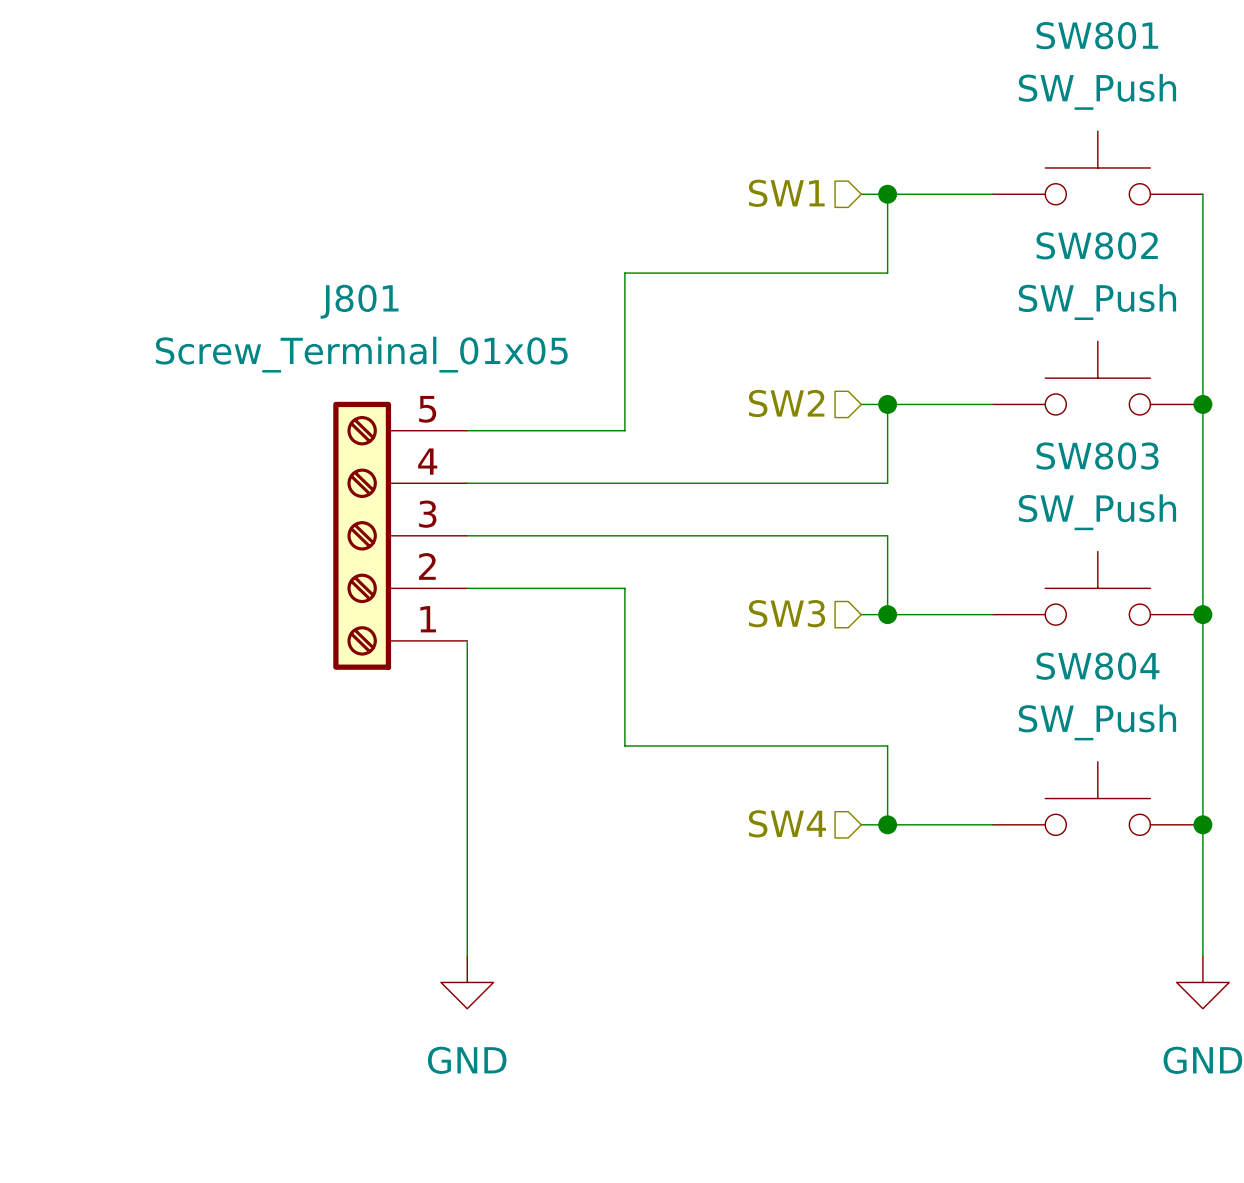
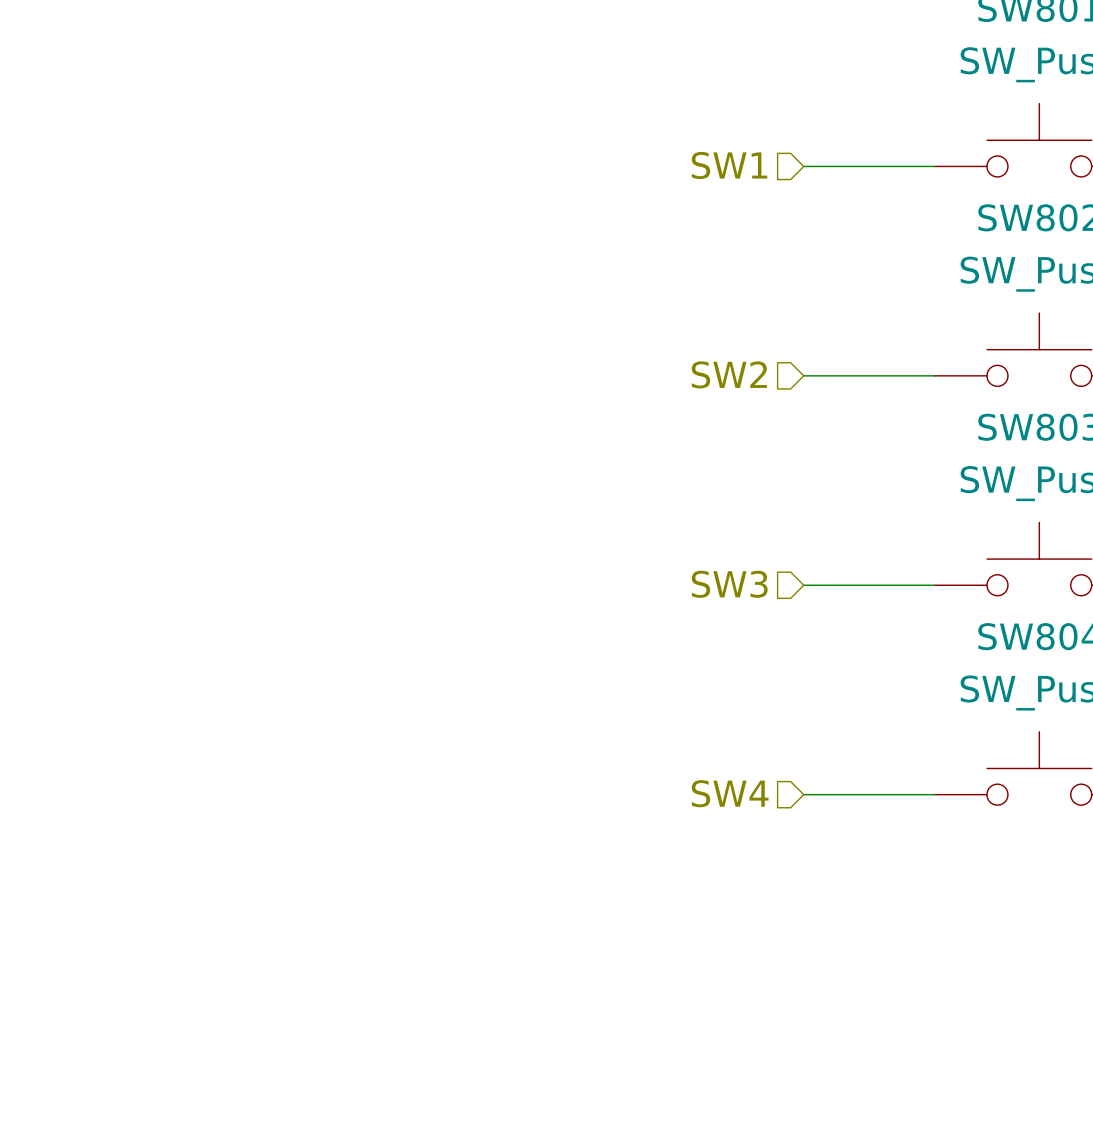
wire: (887, 194) (887, 273) (624, 273) (624, 430) (467, 430) -> none
junction: (887, 194) -> none
wire: (887, 404) (887, 483) (467, 483) -> none
junction: (887, 404) -> none
J801: Screw_Terminal_01x05 (400, 535) -> none
wire: (467, 535) (887, 535) (887, 614) -> none
wire: (467, 588) (624, 588) (624, 746) (887, 746) (887, 824) -> none
junction: (887, 614) -> none
wire: (467, 640) (467, 956) -> none
junction: (887, 824) -> none
power symbol: GND (467, 982) -> none

